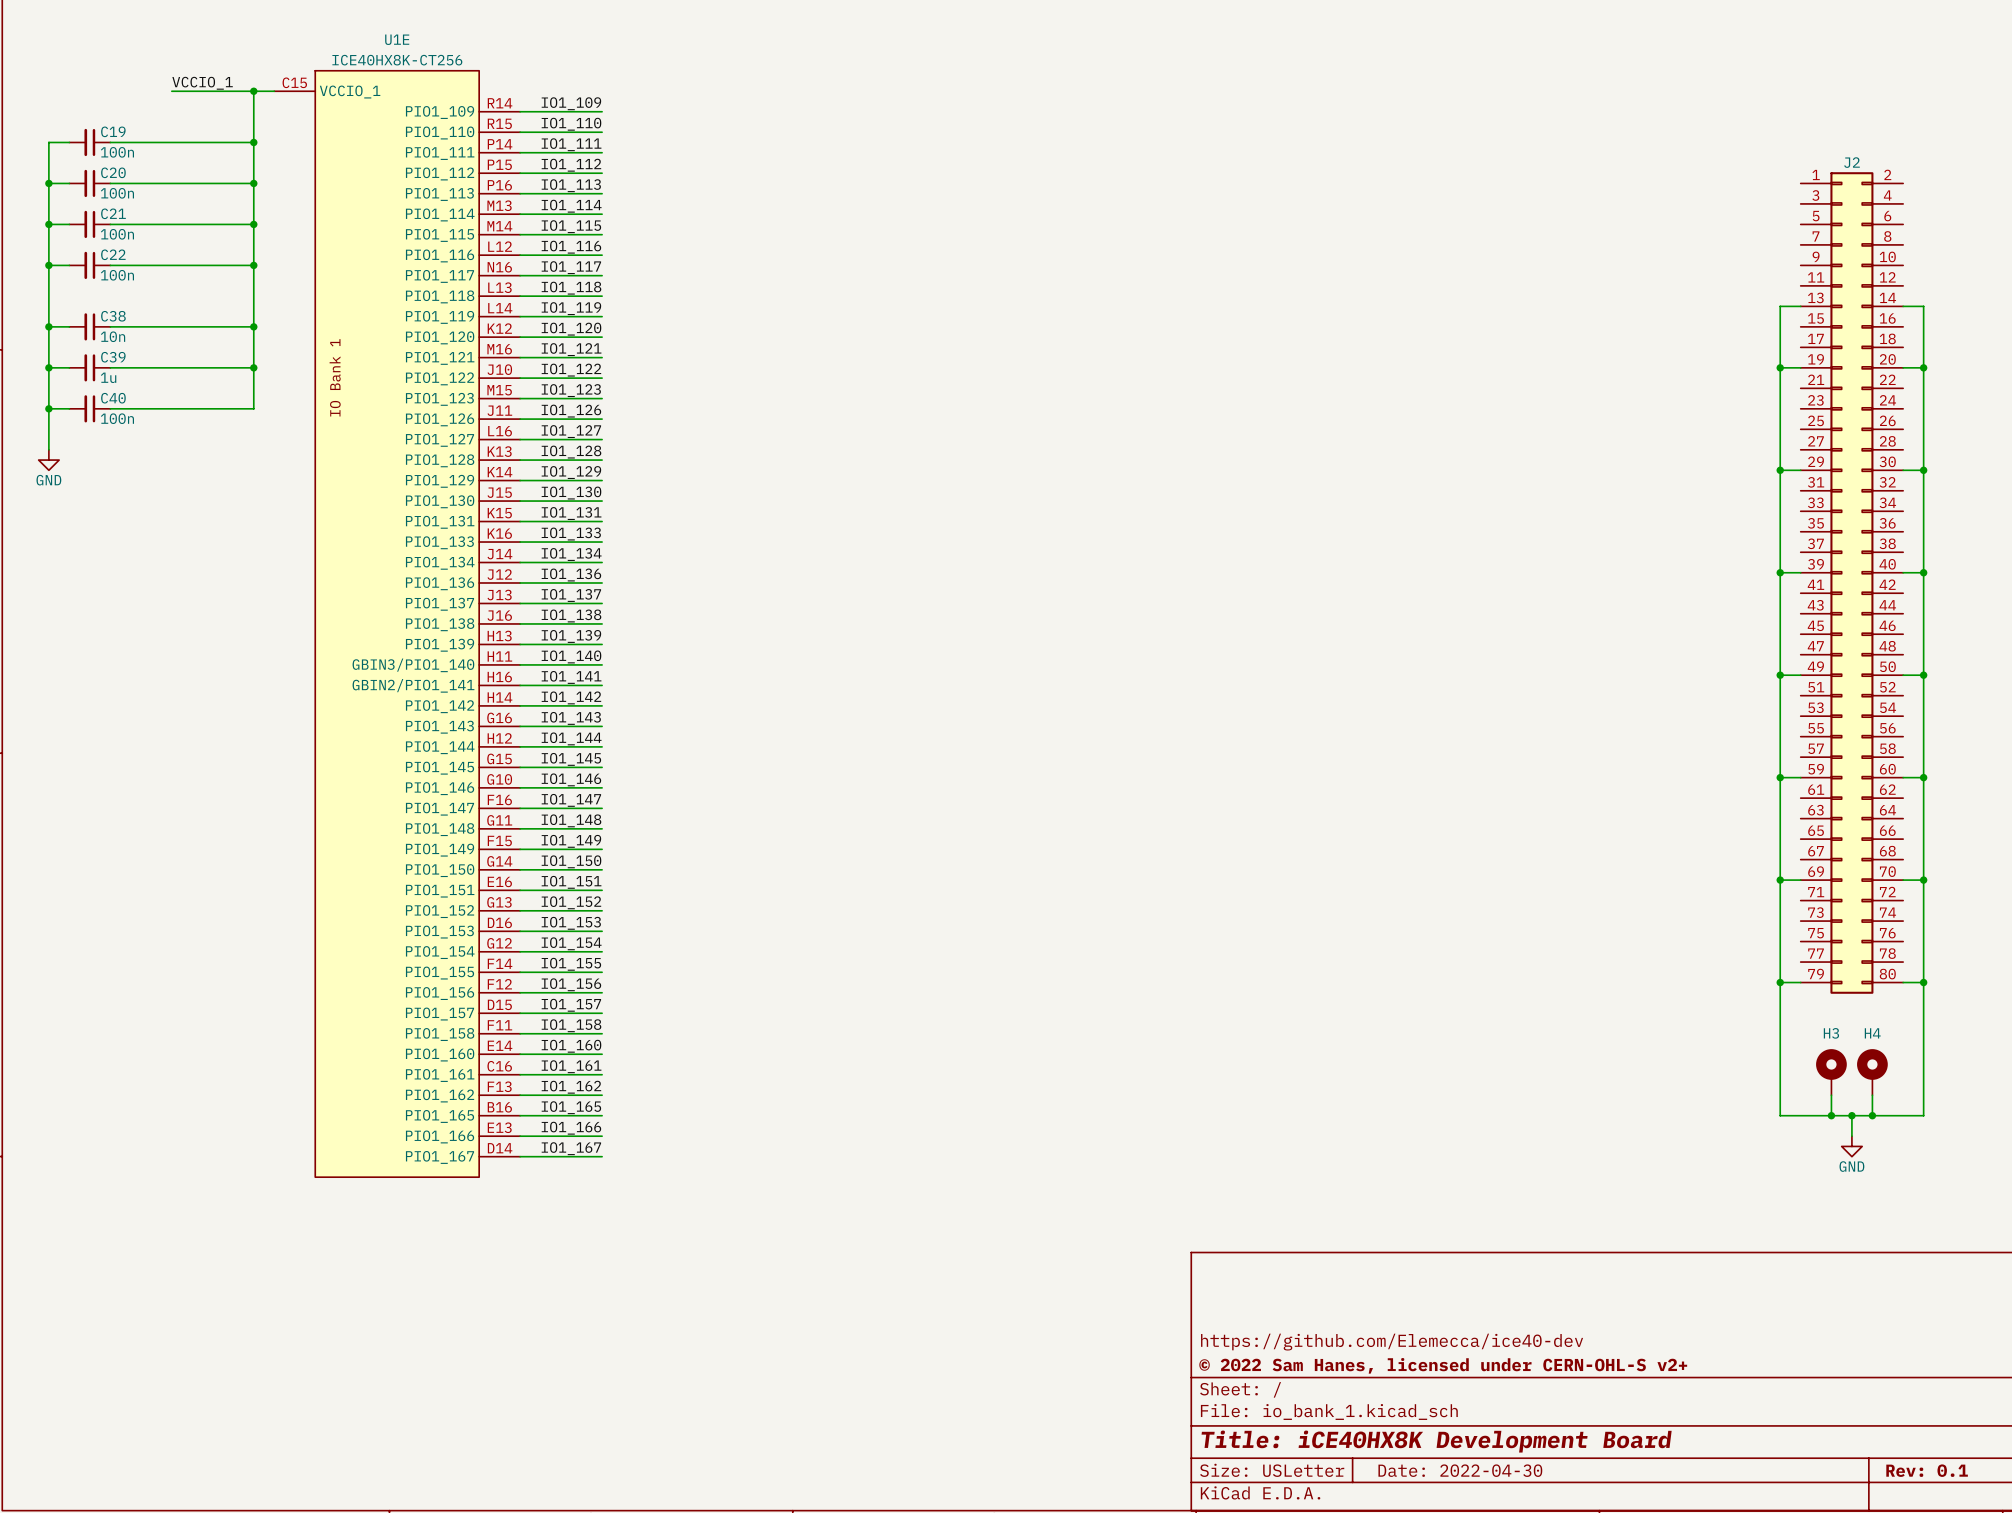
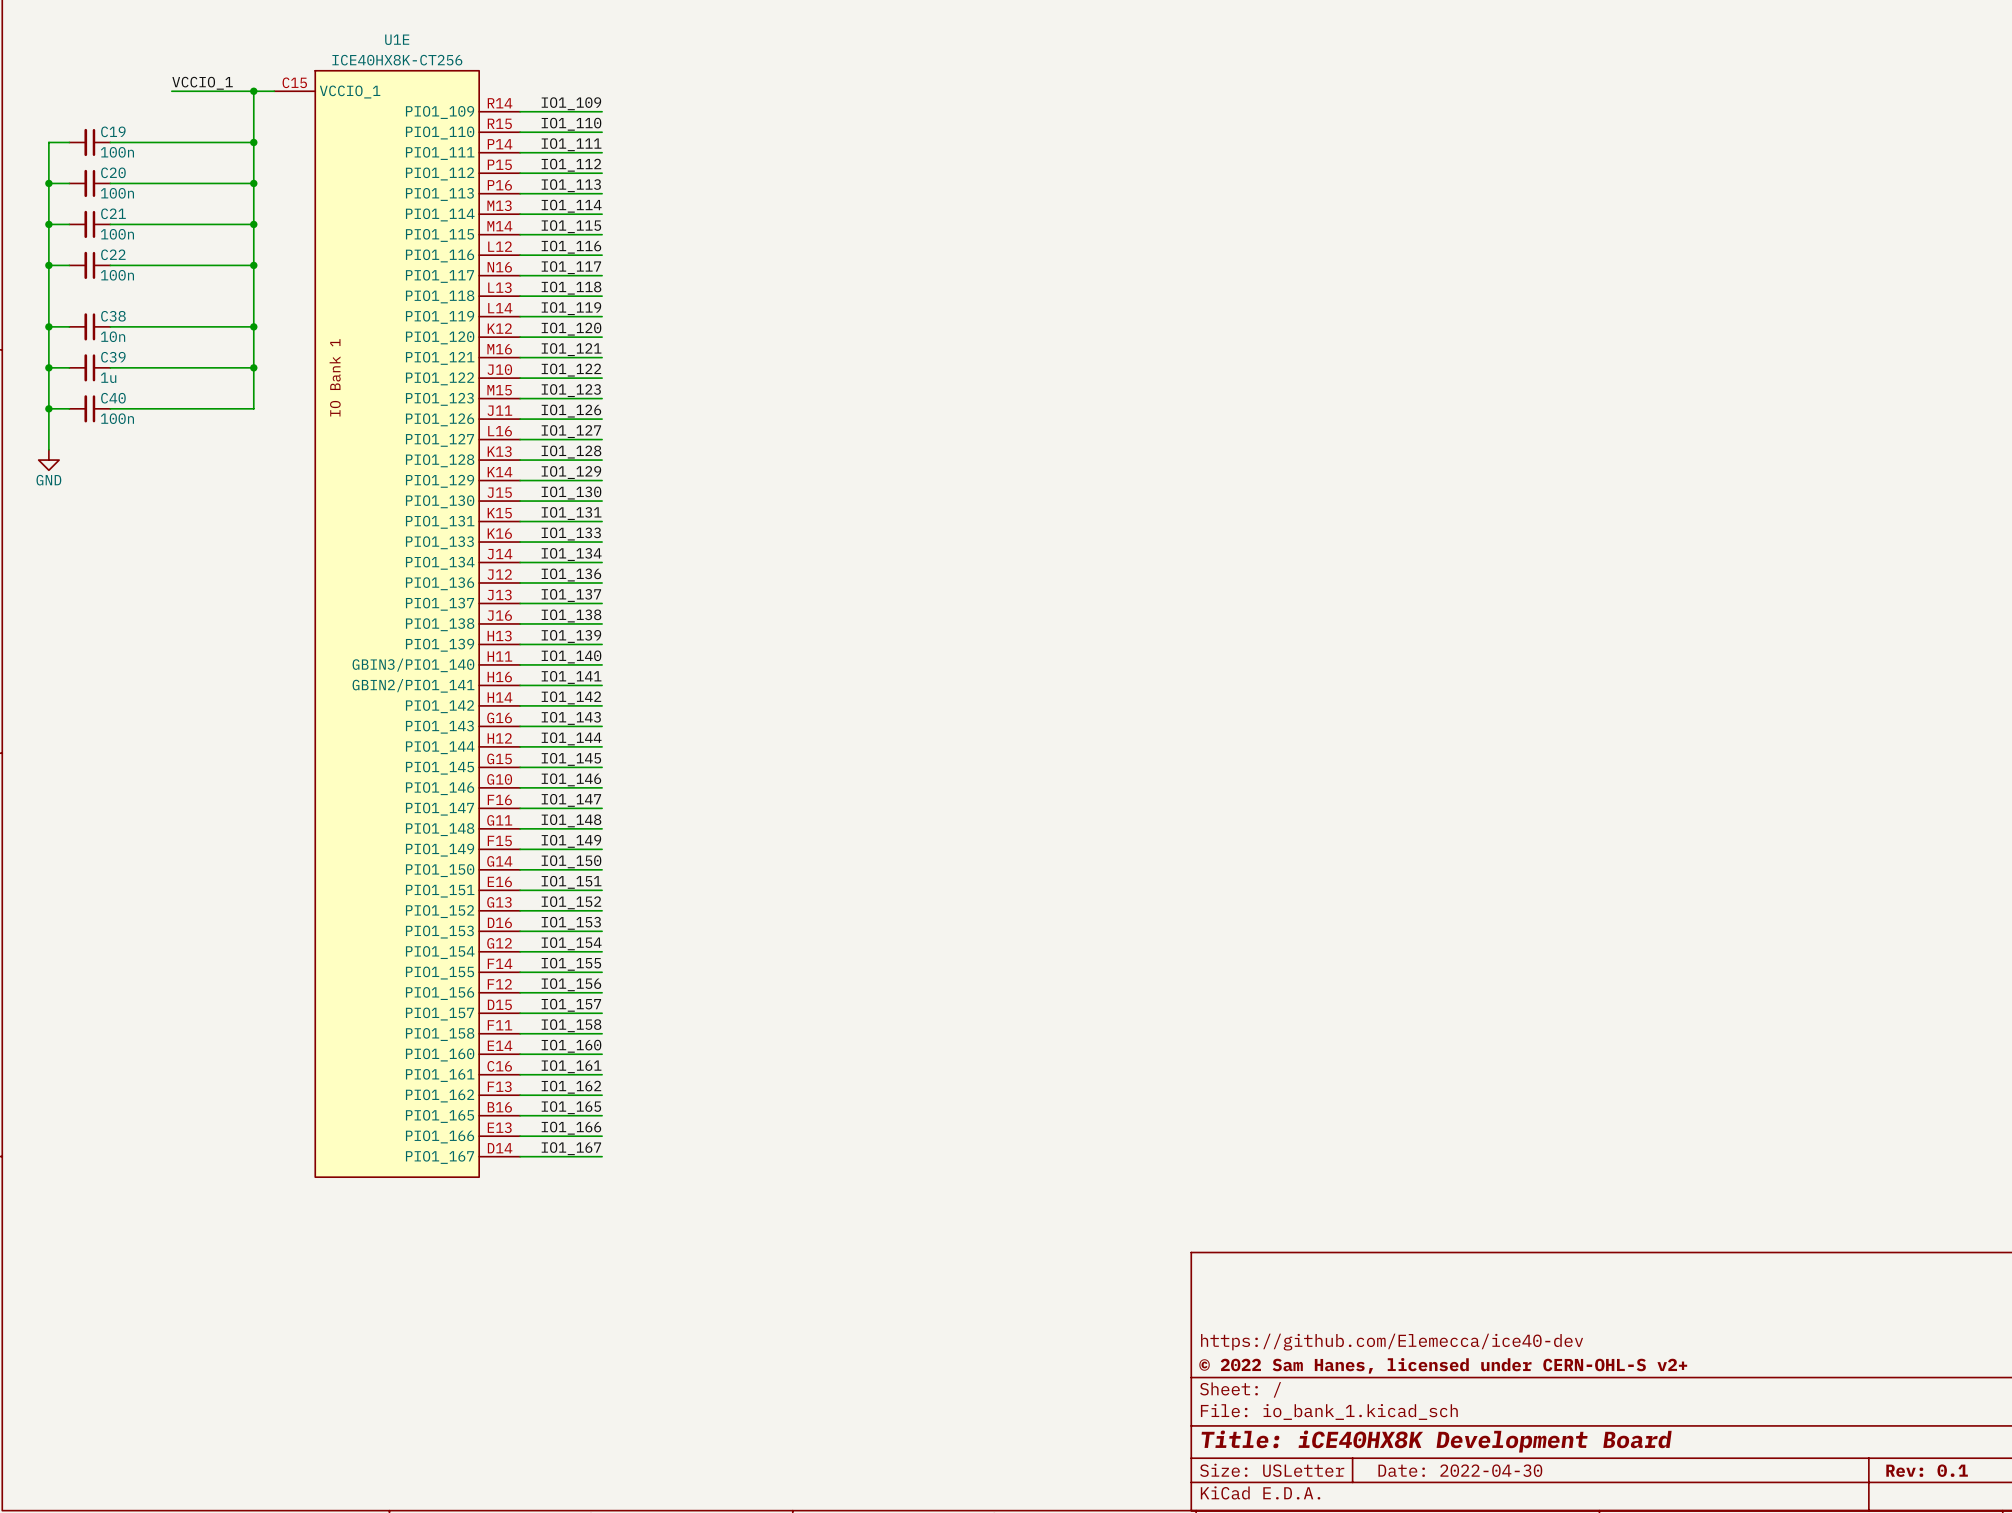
wire: (1800, 306) (1780, 306) (1780, 1115) (1923, 1115) (1923, 306) (1903, 306) -> none
wire: (1780, 367) (1800, 367) -> none
junction: (1780, 367) -> none
wire: (1903, 367) (1923, 367) -> none
junction: (1923, 367) -> none
wire: (1780, 470) (1800, 470) -> none
junction: (1780, 470) -> none
wire: (1903, 470) (1923, 470) -> none
junction: (1923, 470) -> none
wire: (1780, 572) (1800, 572) -> none
junction: (1780, 572) -> none
wire: (1903, 572) (1923, 572) -> none
junction: (1923, 572) -> none
J2: (1851, 582) -> none
wire: (1780, 675) (1800, 675) -> none
junction: (1780, 675) -> none
wire: (1903, 675) (1923, 675) -> none
junction: (1923, 675) -> none
wire: (1780, 777) (1800, 777) -> none
junction: (1780, 777) -> none
wire: (1903, 777) (1923, 777) -> none
junction: (1923, 777) -> none
wire: (1780, 880) (1800, 880) -> none
junction: (1780, 880) -> none
wire: (1903, 880) (1923, 880) -> none
junction: (1923, 880) -> none
wire: (1780, 982) (1800, 982) -> none
junction: (1780, 982) -> none
wire: (1903, 982) (1923, 982) -> none
junction: (1923, 982) -> none
H3: (1831, 1072) -> none
H4: (1872, 1072) -> none
wire: (1831, 1095) (1831, 1115) -> none
wire: (1872, 1095) (1872, 1115) -> none
junction: (1831, 1115) -> none
wire: (1851, 1115) (1851, 1136) -> none
junction: (1851, 1115) -> none
junction: (1872, 1115) -> none
power symbol: GND (1851, 1146) -> none

